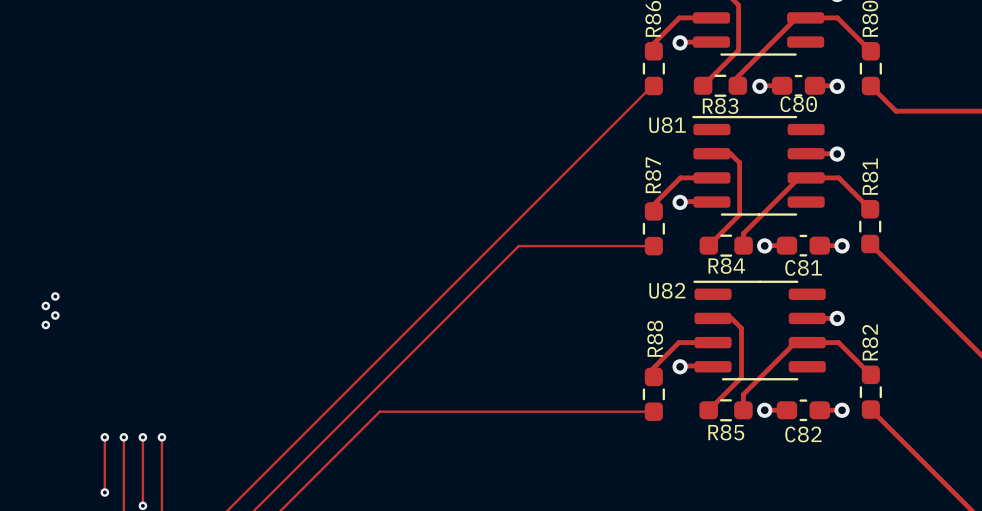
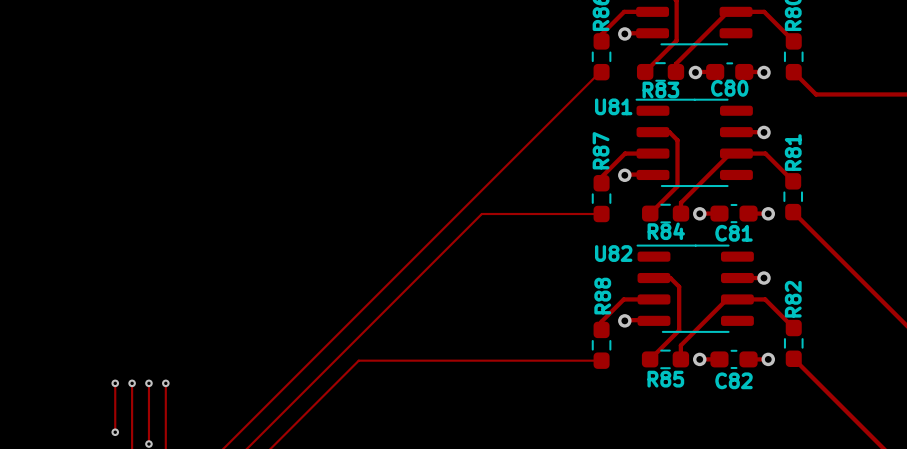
via: (55, 296) -> none
via: (45, 305) -> none
via: (55, 315) -> none
via: (45, 325) -> none

